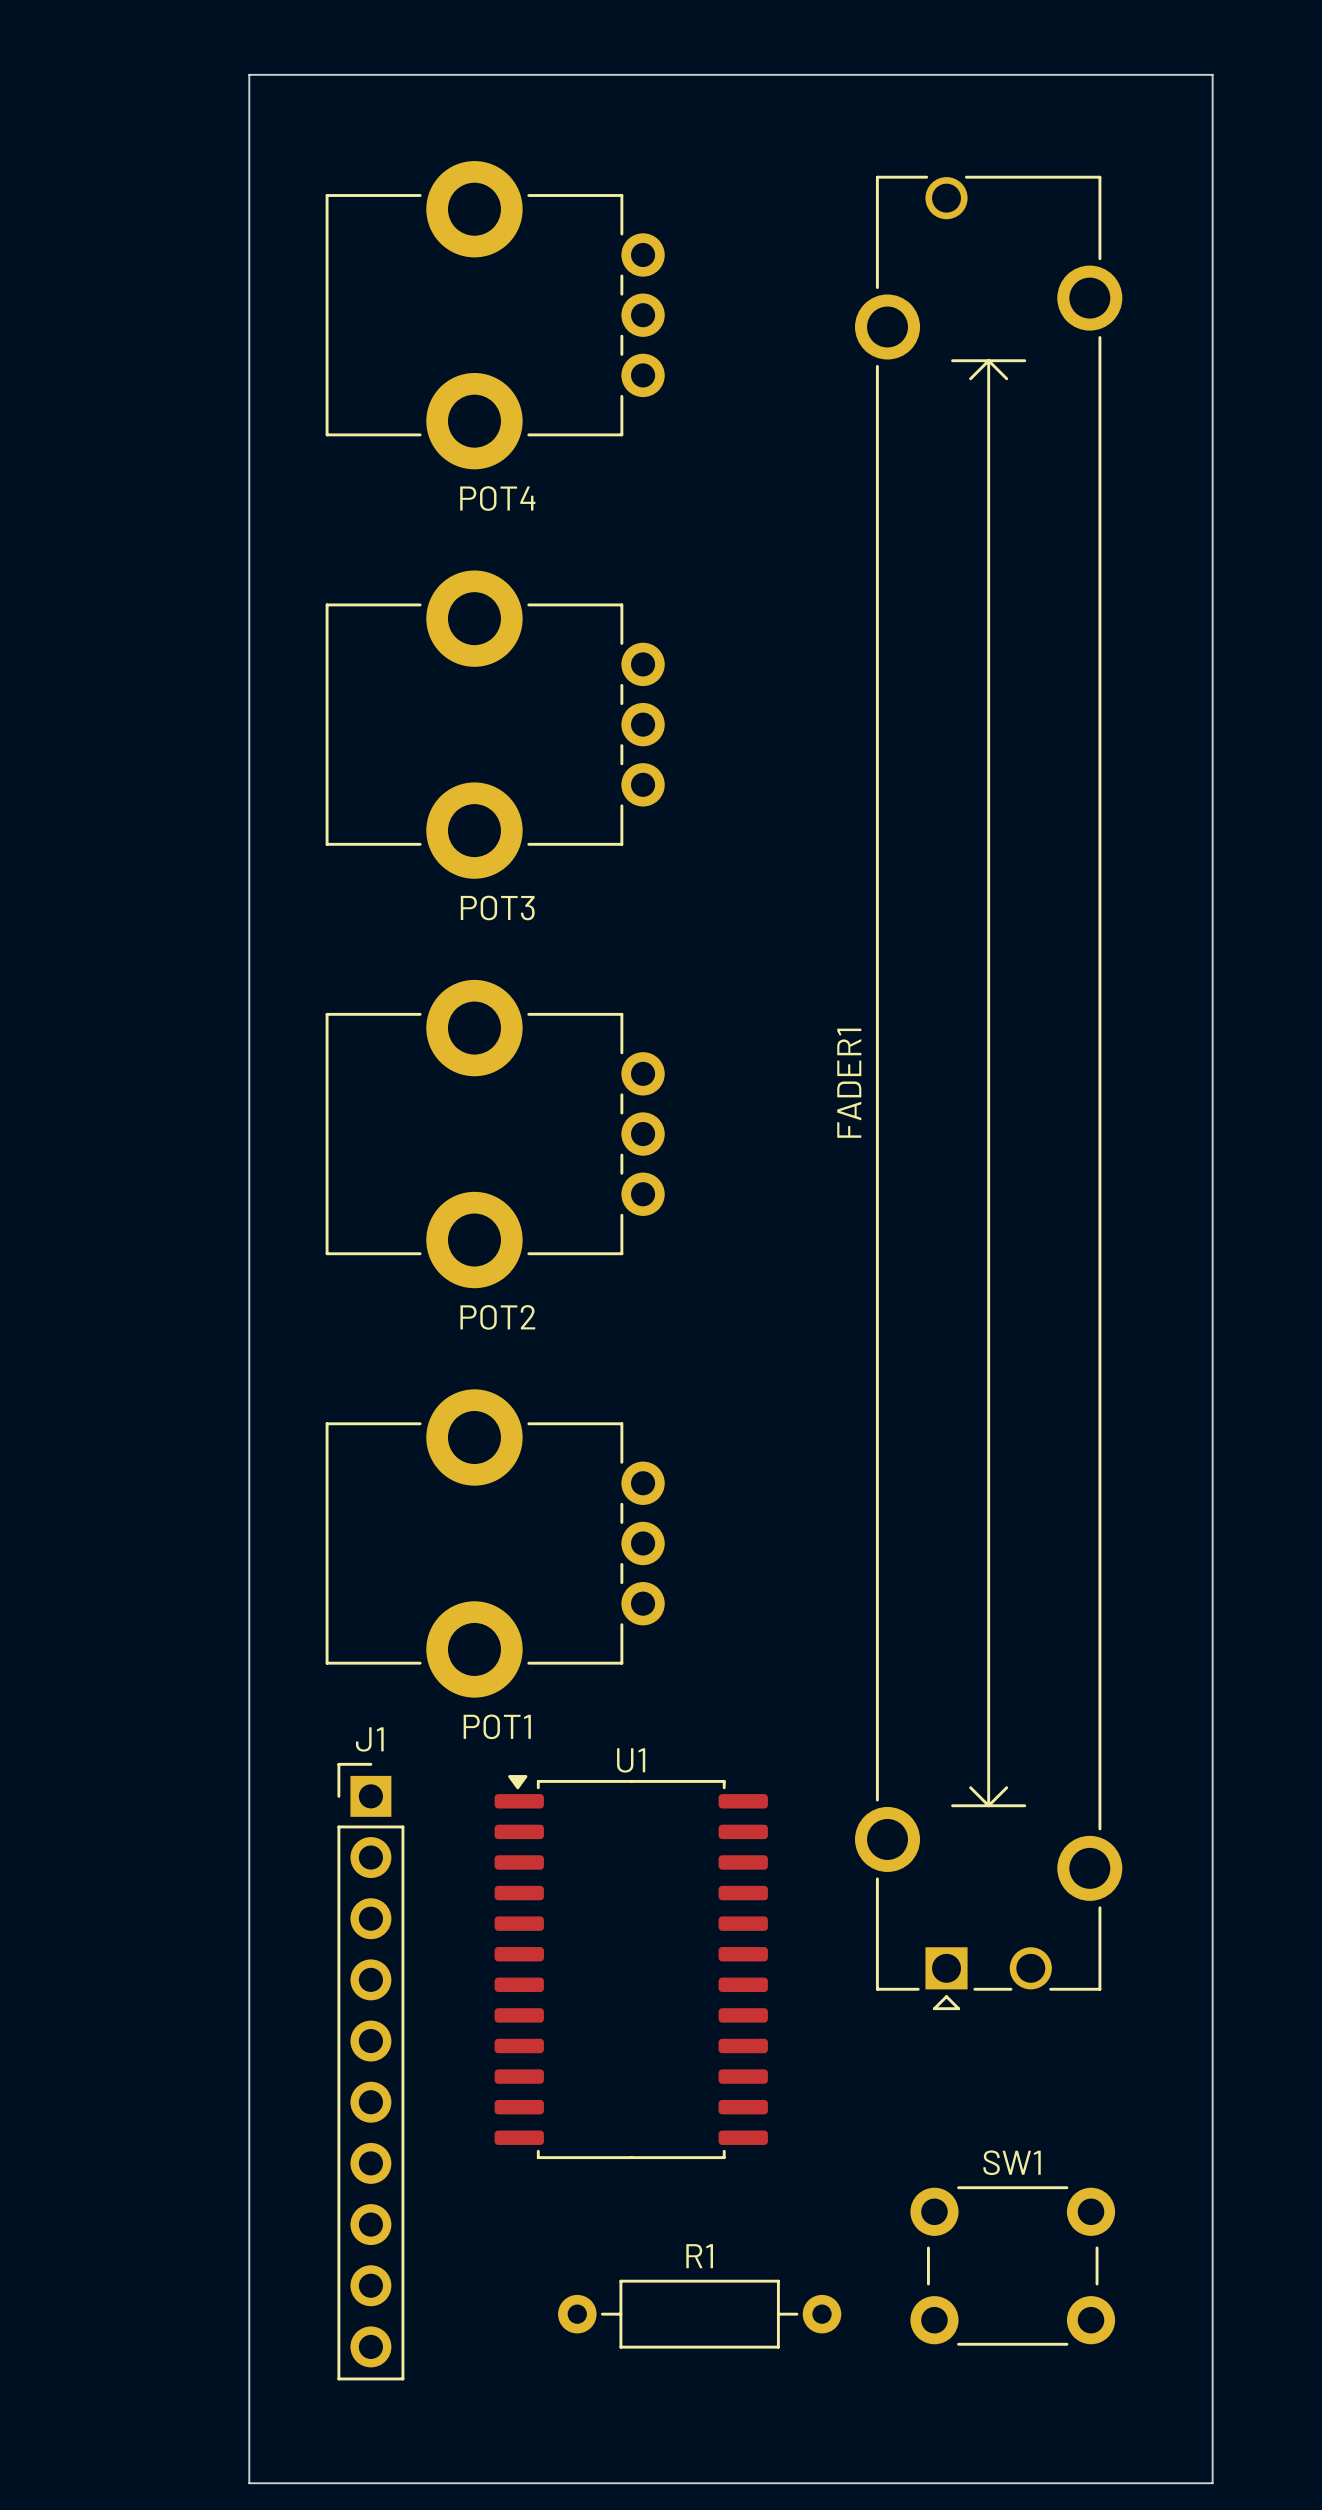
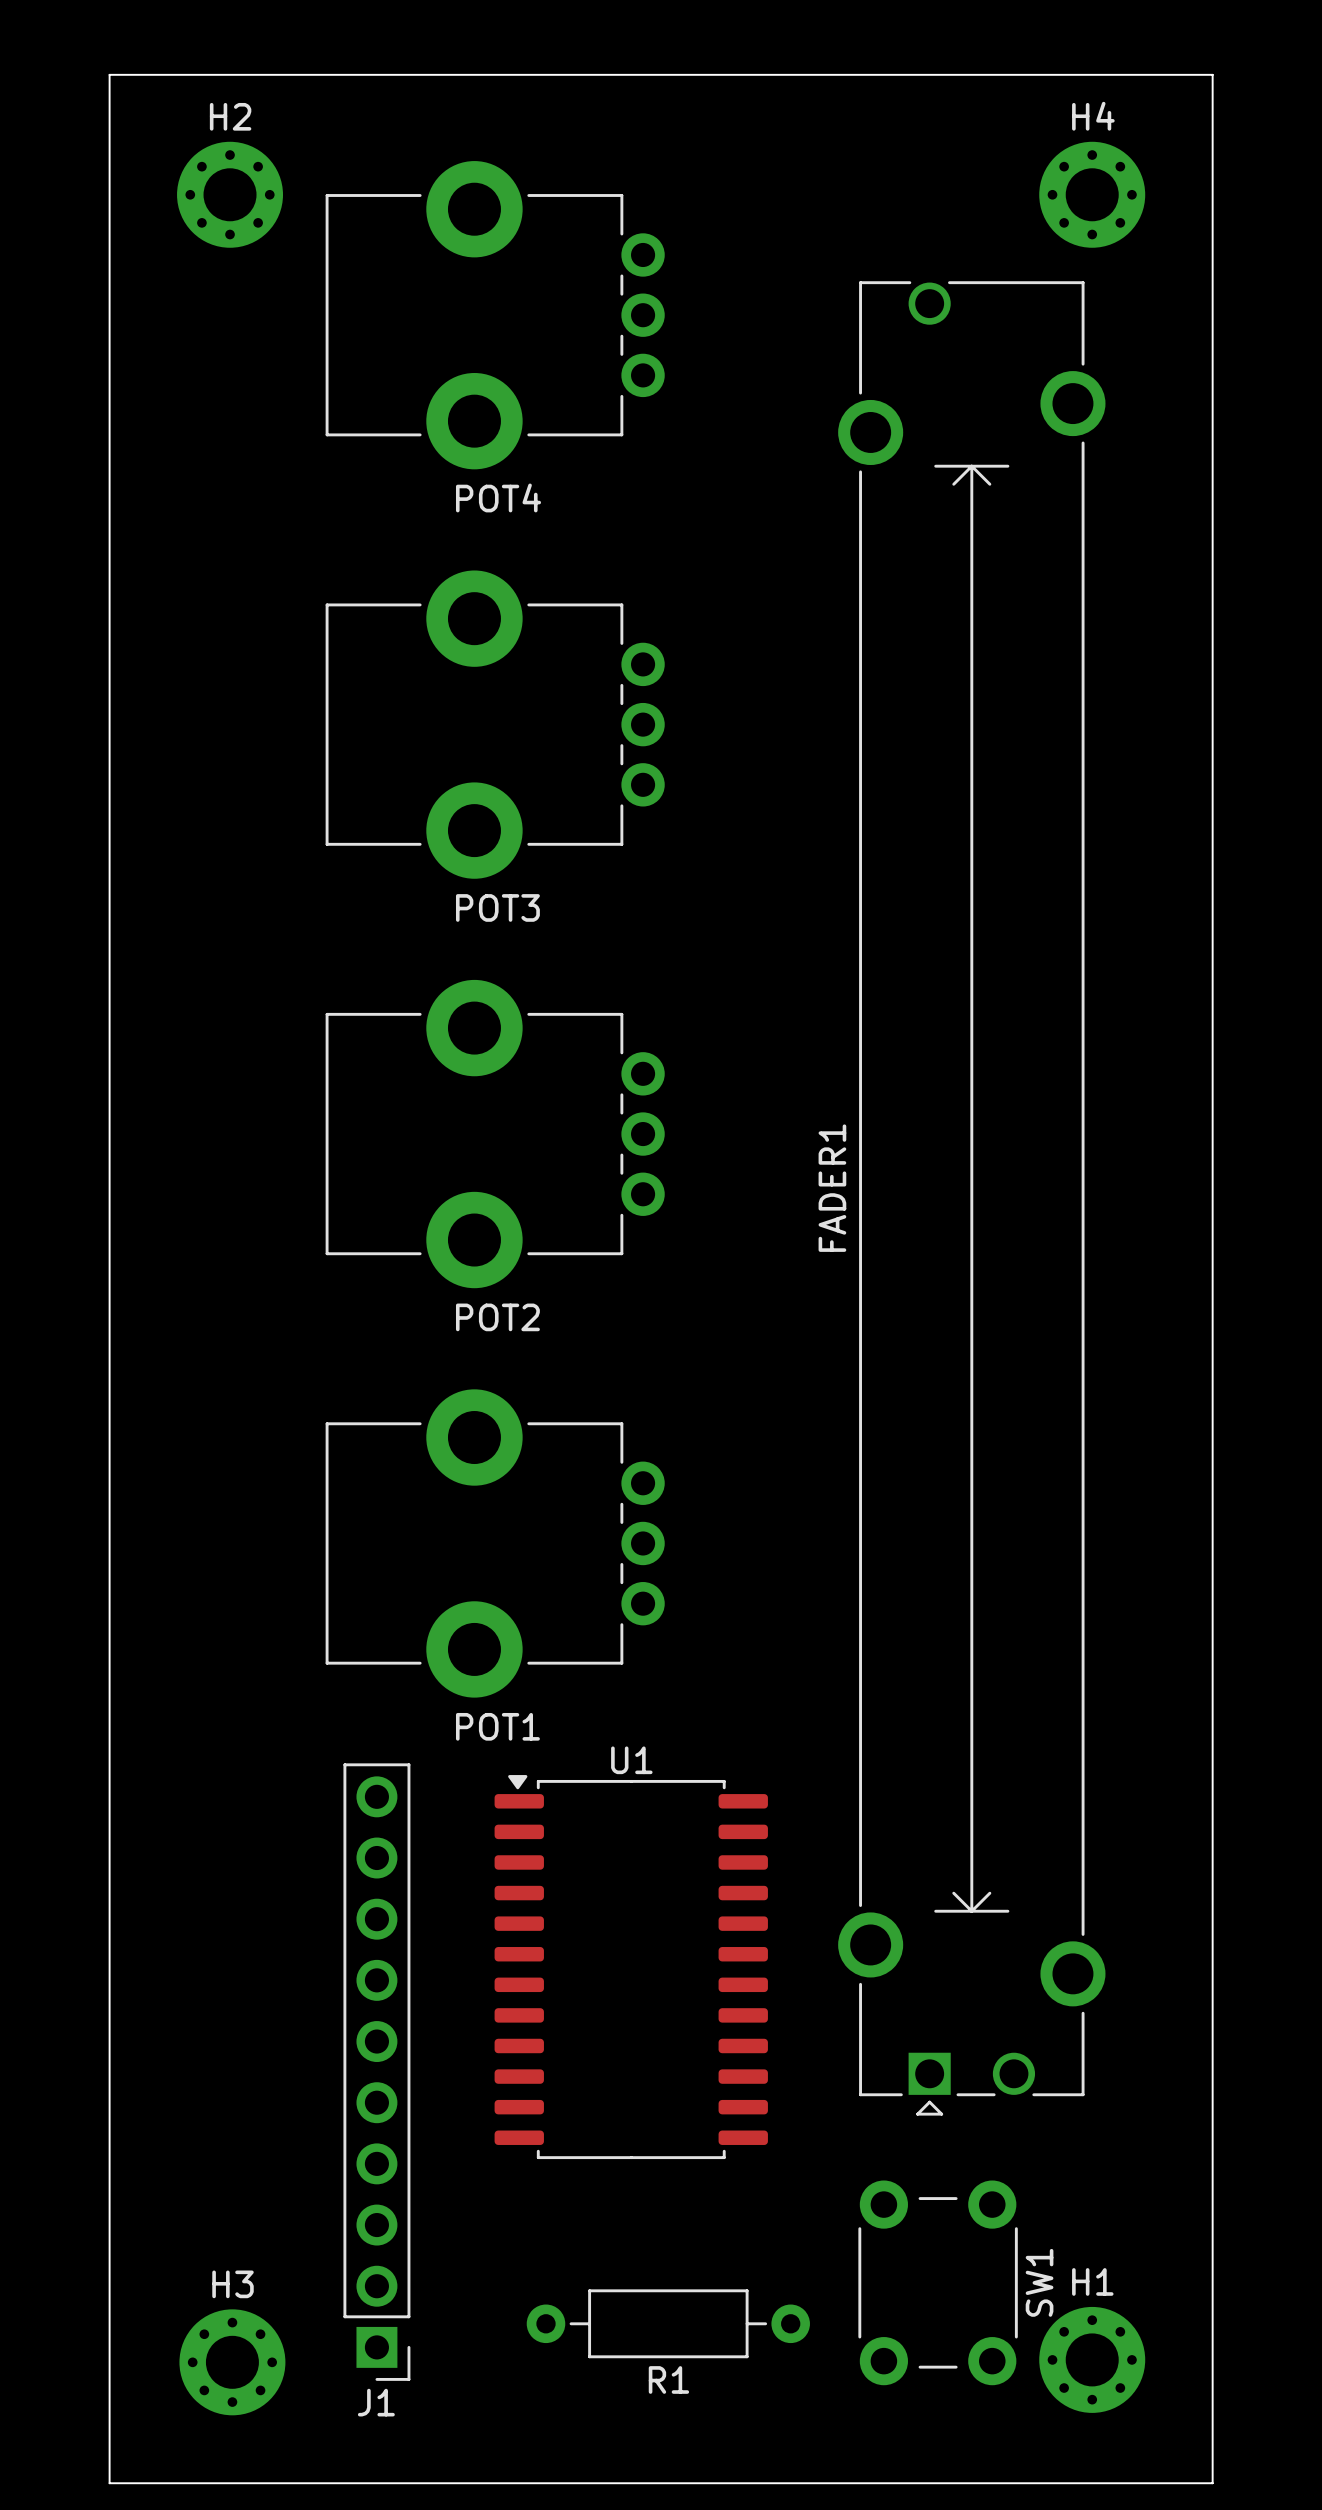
board edge: (249, 74) (249, 2483) -> (249, 74) (109, 74) (109, 2483) (249, 2483)
H2: none -> (230, 194)
H4: none -> (1092, 194)
FADER1 position: (988, 1092) -> (971, 1198)
J1 rotation: 0° (370, 2071) -> 180° (376, 2072)
R1 name position: R1 (699, 2256) -> R1 (668, 2379)
SW1 rotation: 0° (1012, 2265) -> 90° clockwise (938, 2282)
R1 position: (699, 2314) -> (668, 2323)
H1: none -> (1092, 2359)
H3: none -> (232, 2362)

